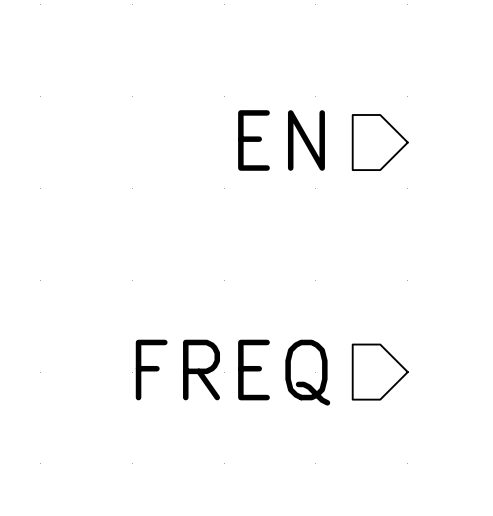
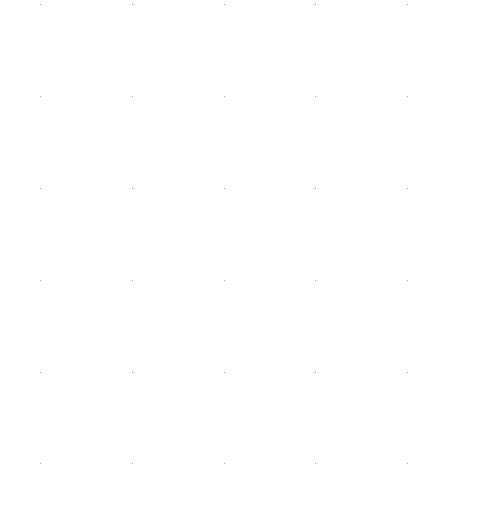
hierarchical label: EN (281, 140) -> none
hierarchical label: FREQ (233, 372) -> none

